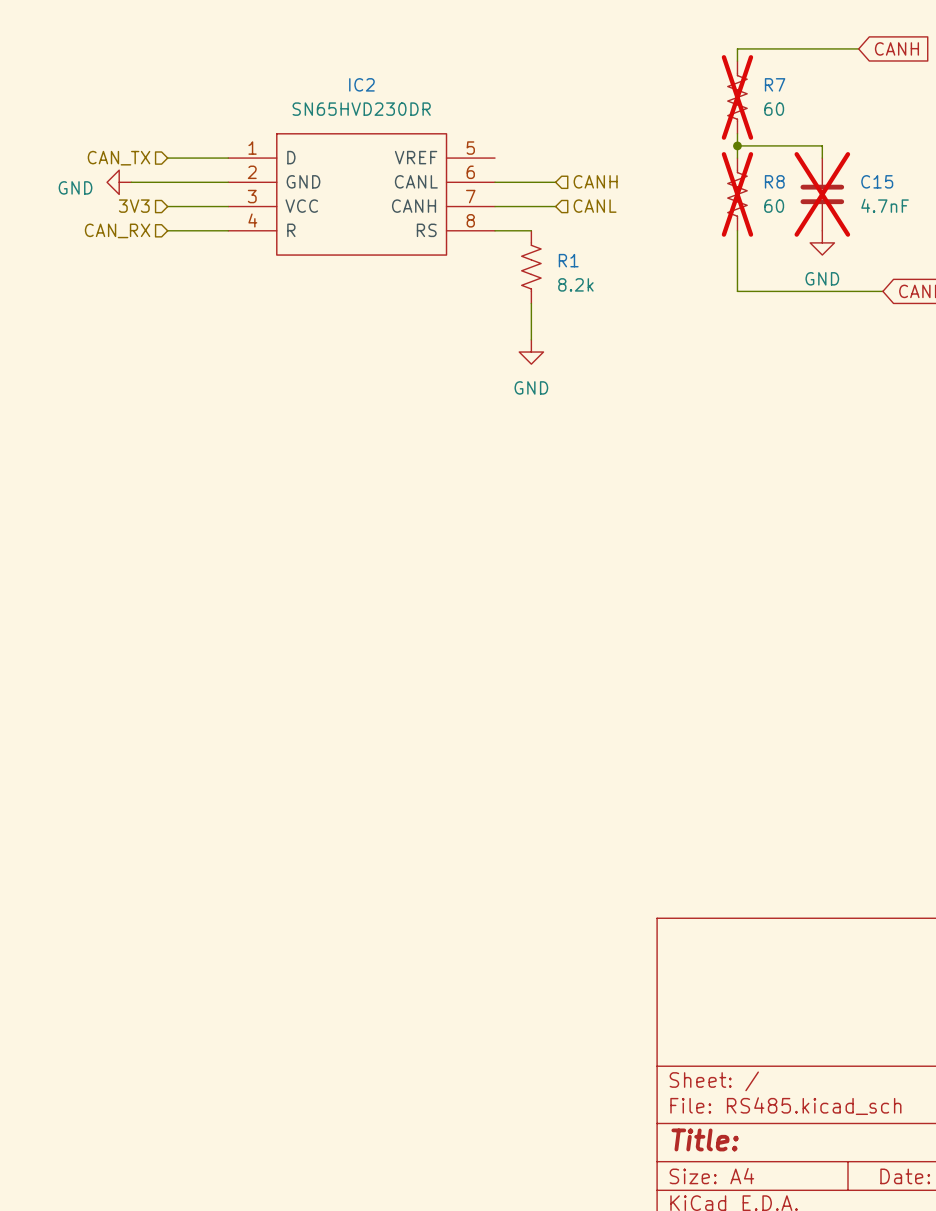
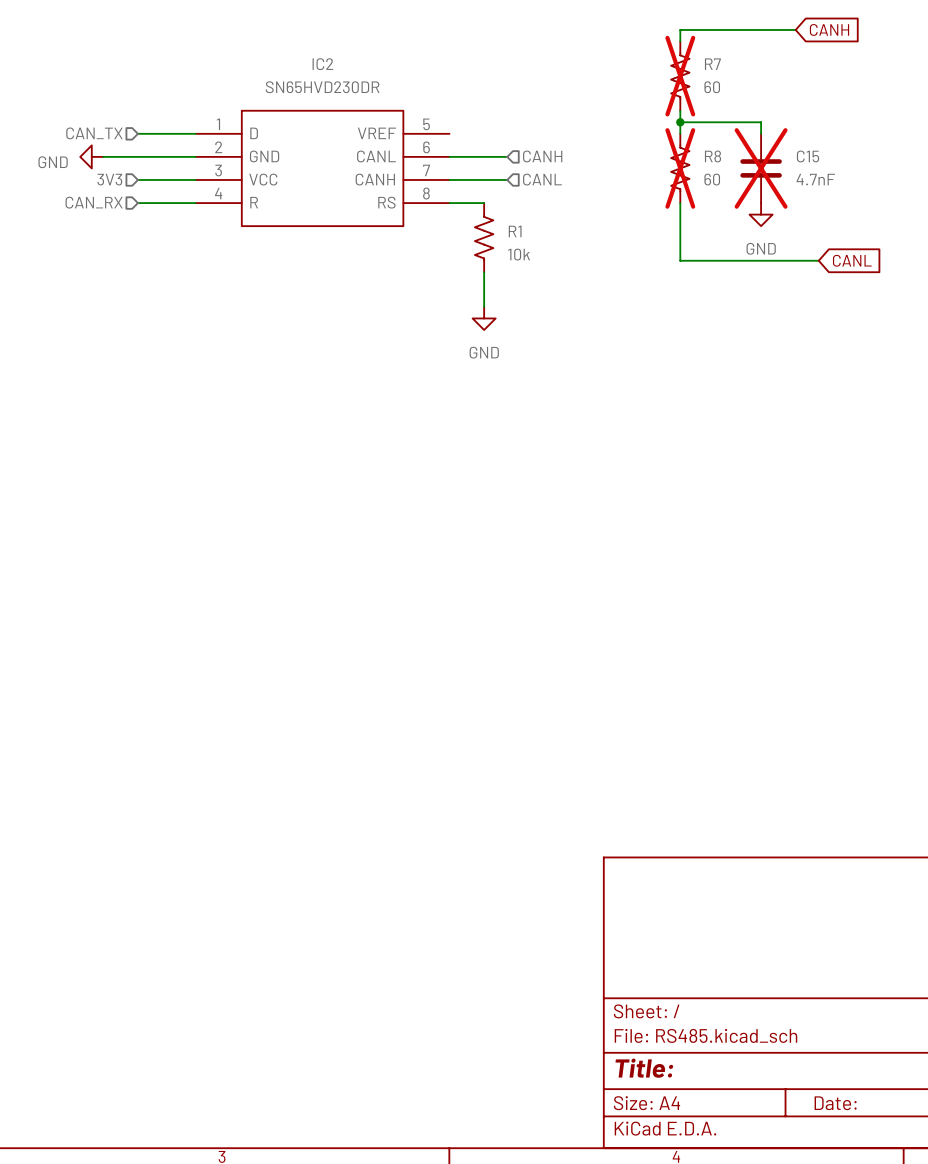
R1 value: 8.2k (575, 284) -> 10k (519, 254)

